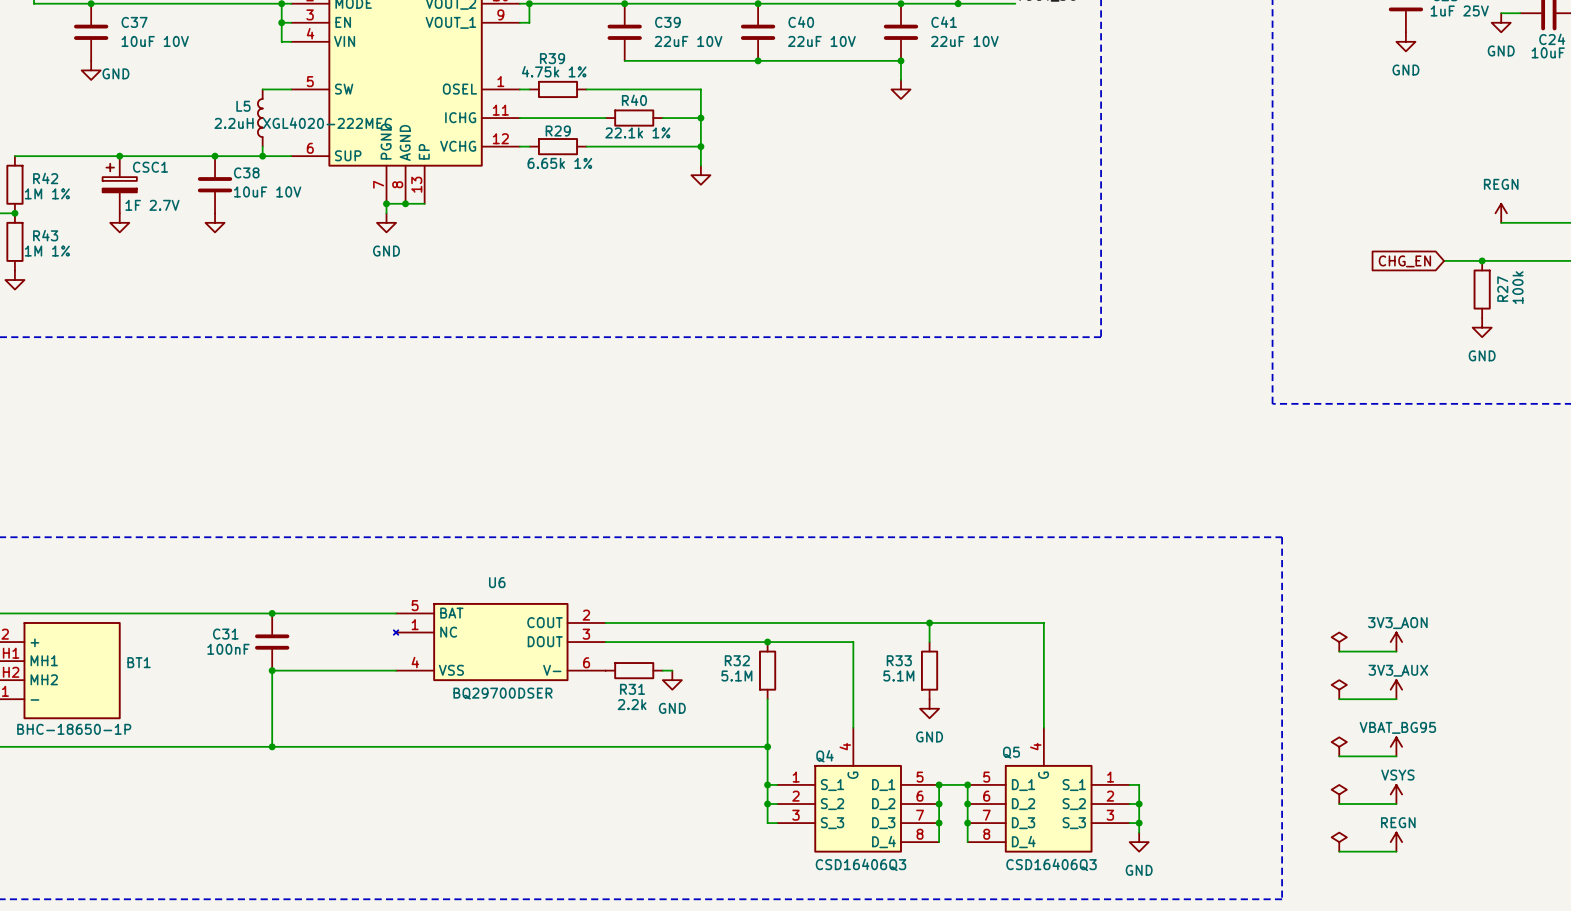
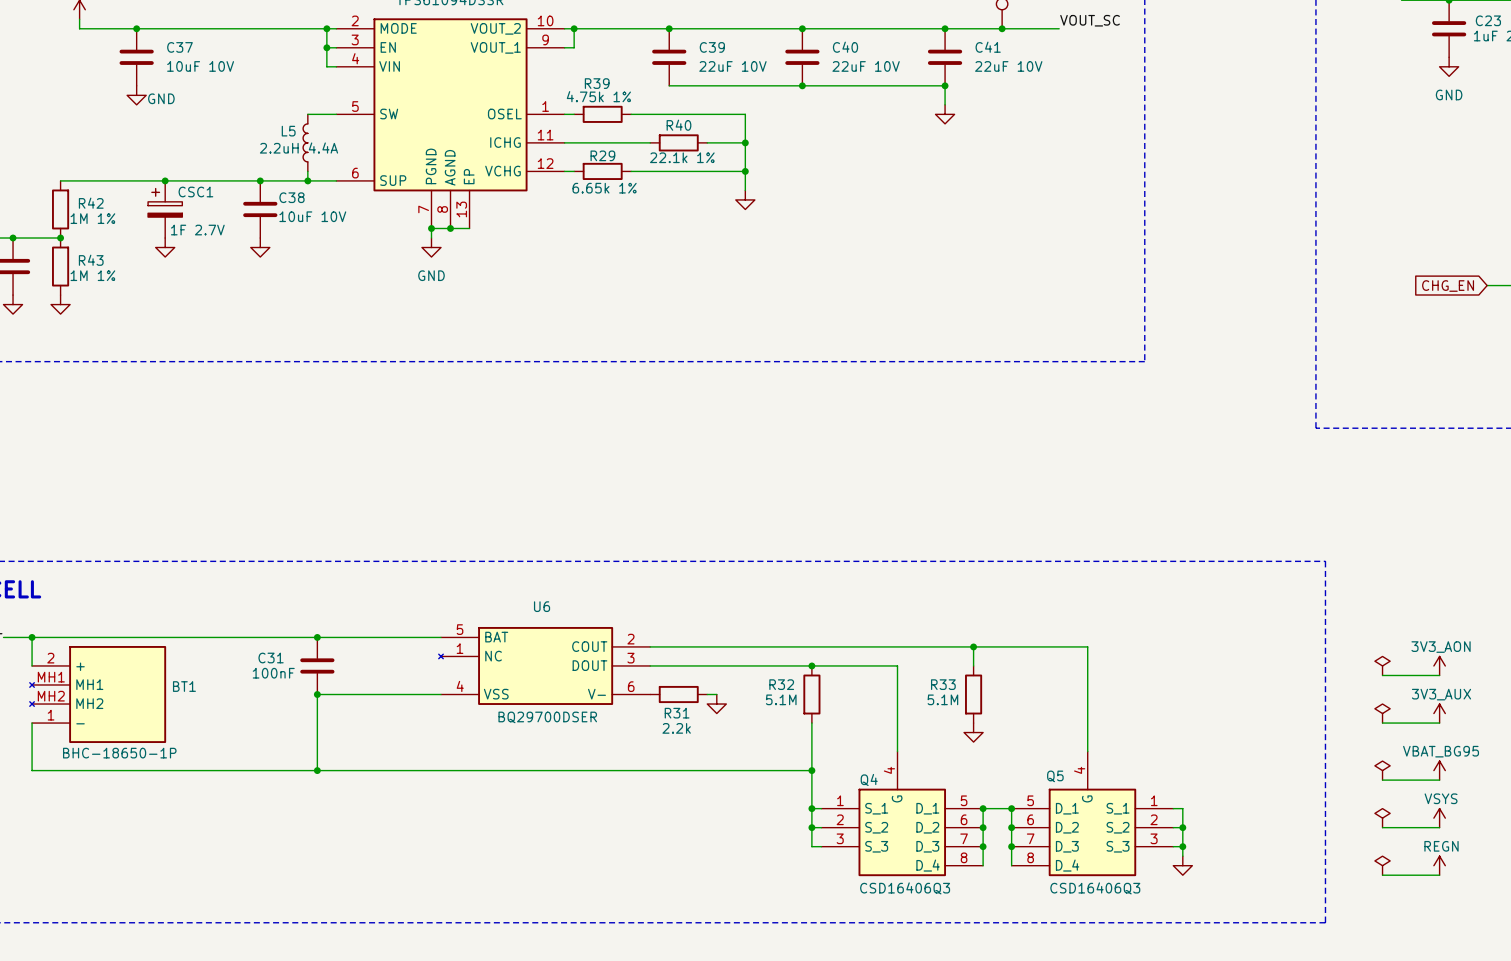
L5 value: 2.2uH XGL4020-222MEC (303, 123) -> 2.2uH 4.4A (299, 148)
power symbol text: GND (672, 708) -> none
power symbol text: GND (929, 736) -> none
power symbol text: GND (1139, 870) -> none

